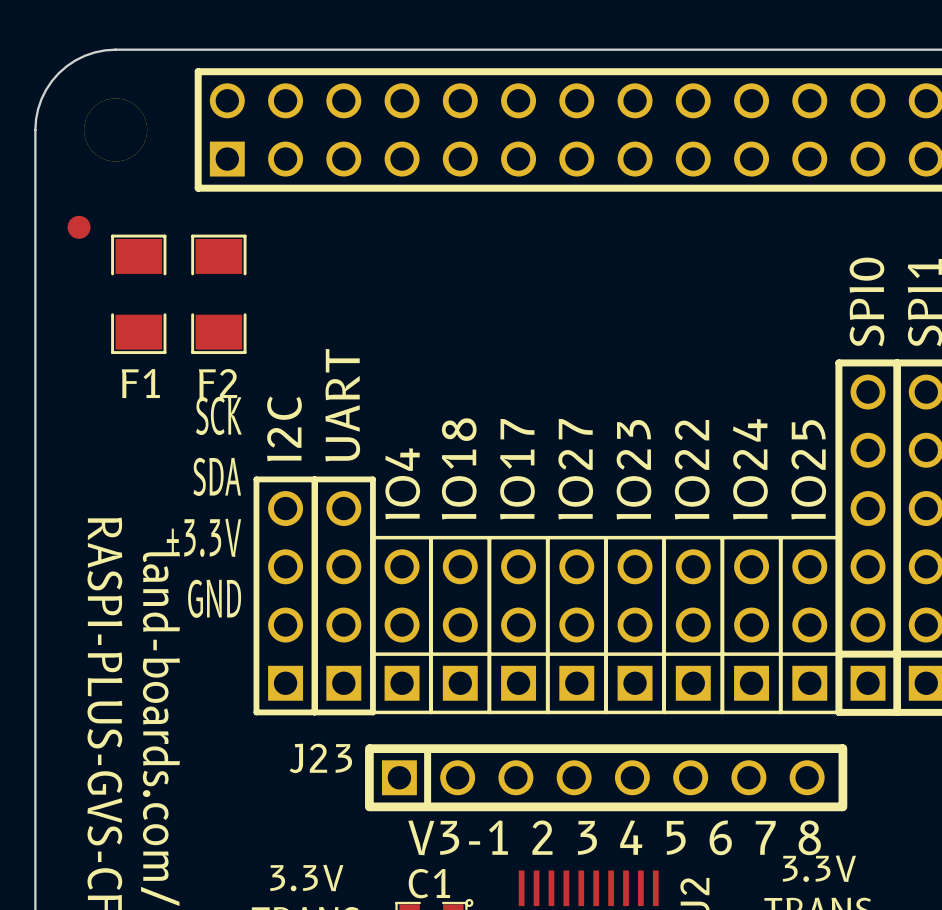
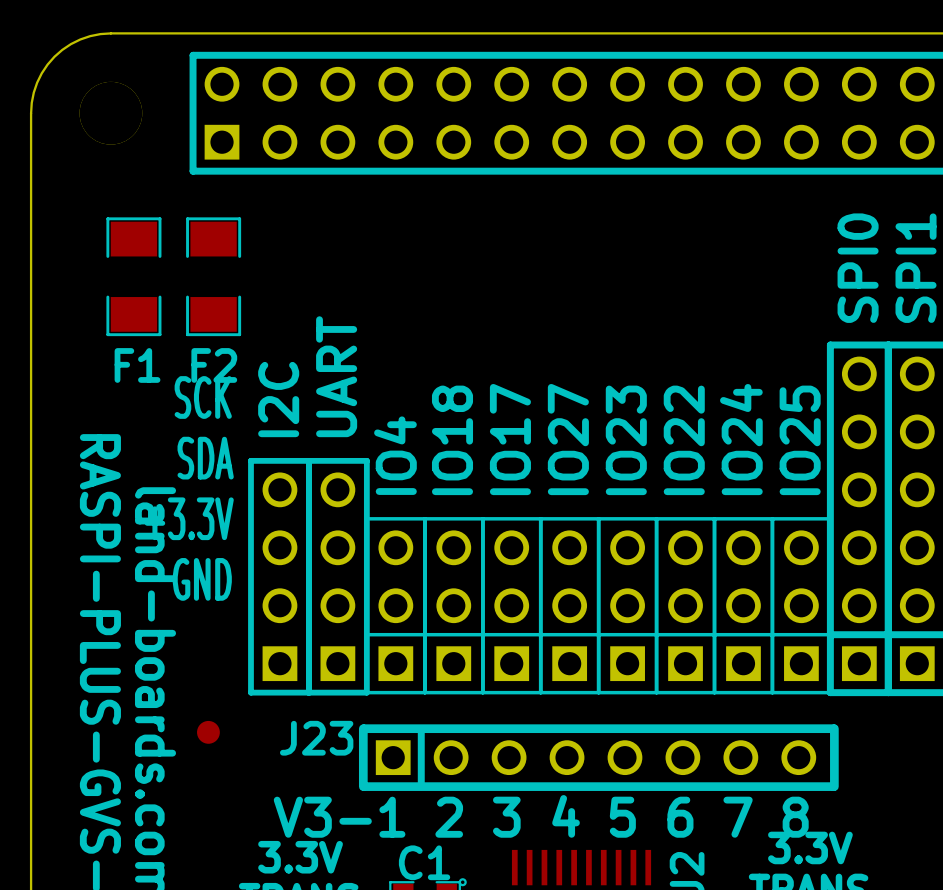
part position: (79, 227) -> (208, 732)

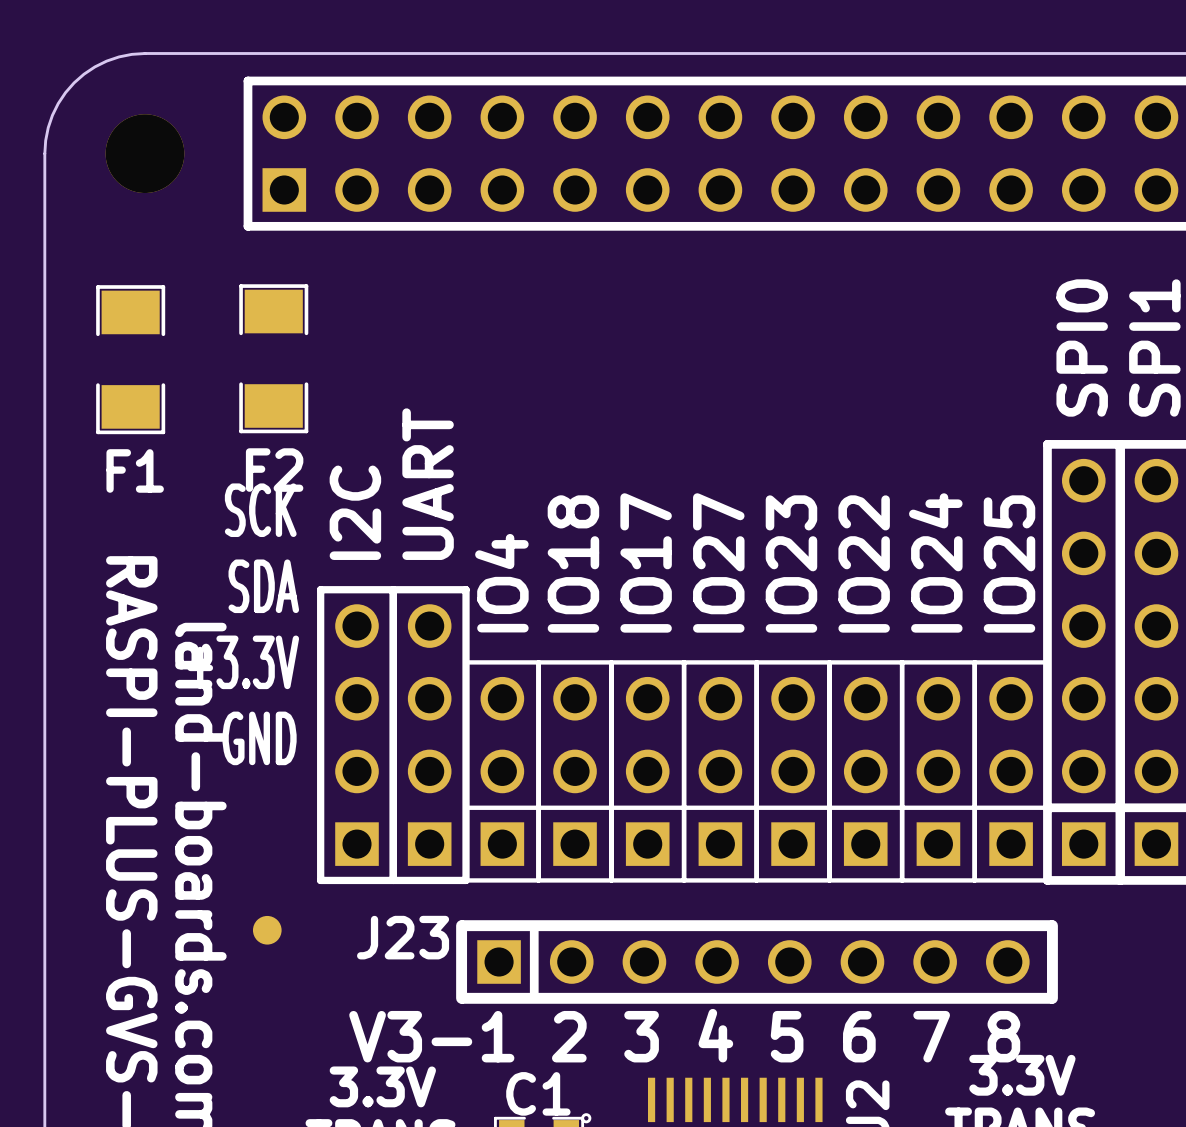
F1 position: (133, 276) -> (130, 359)

